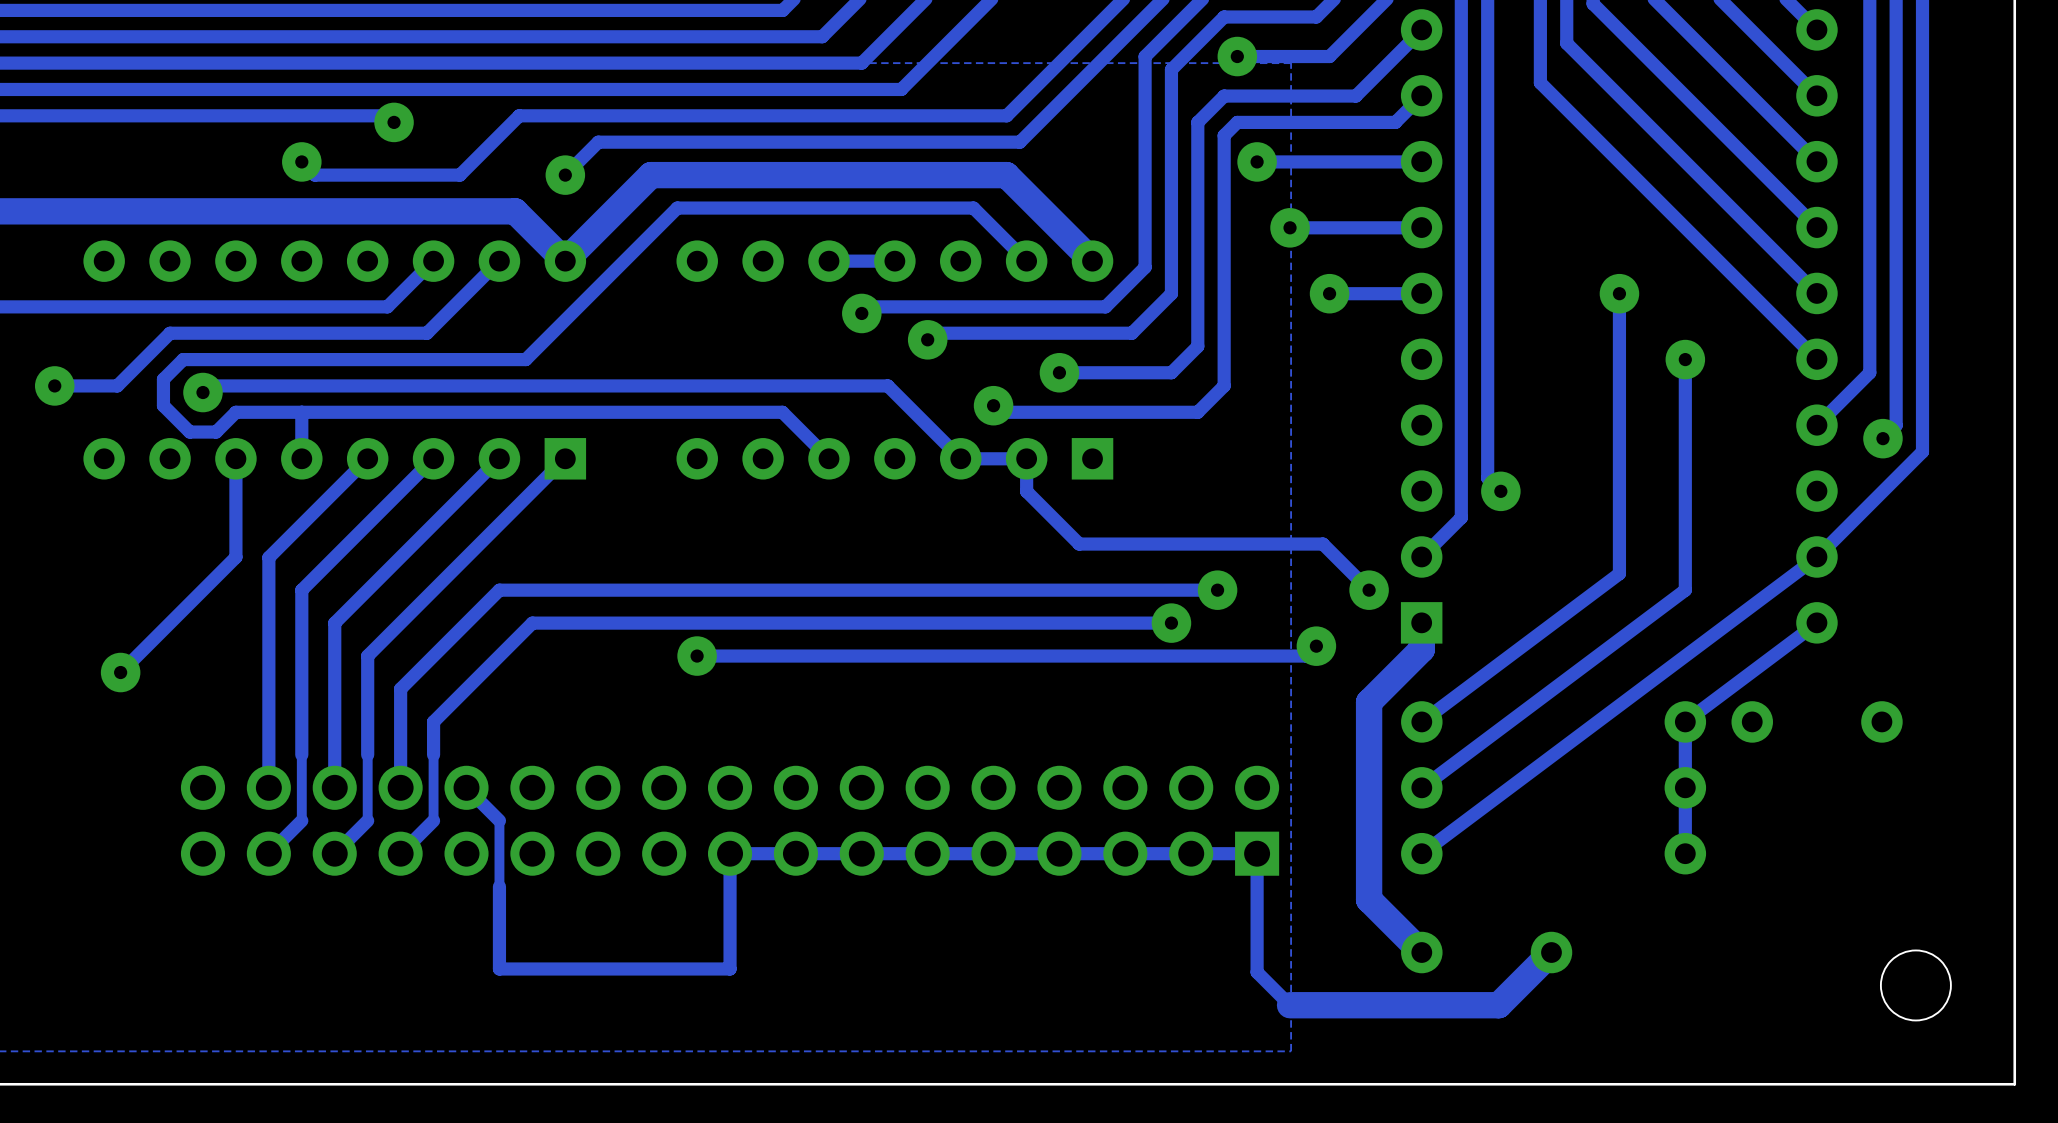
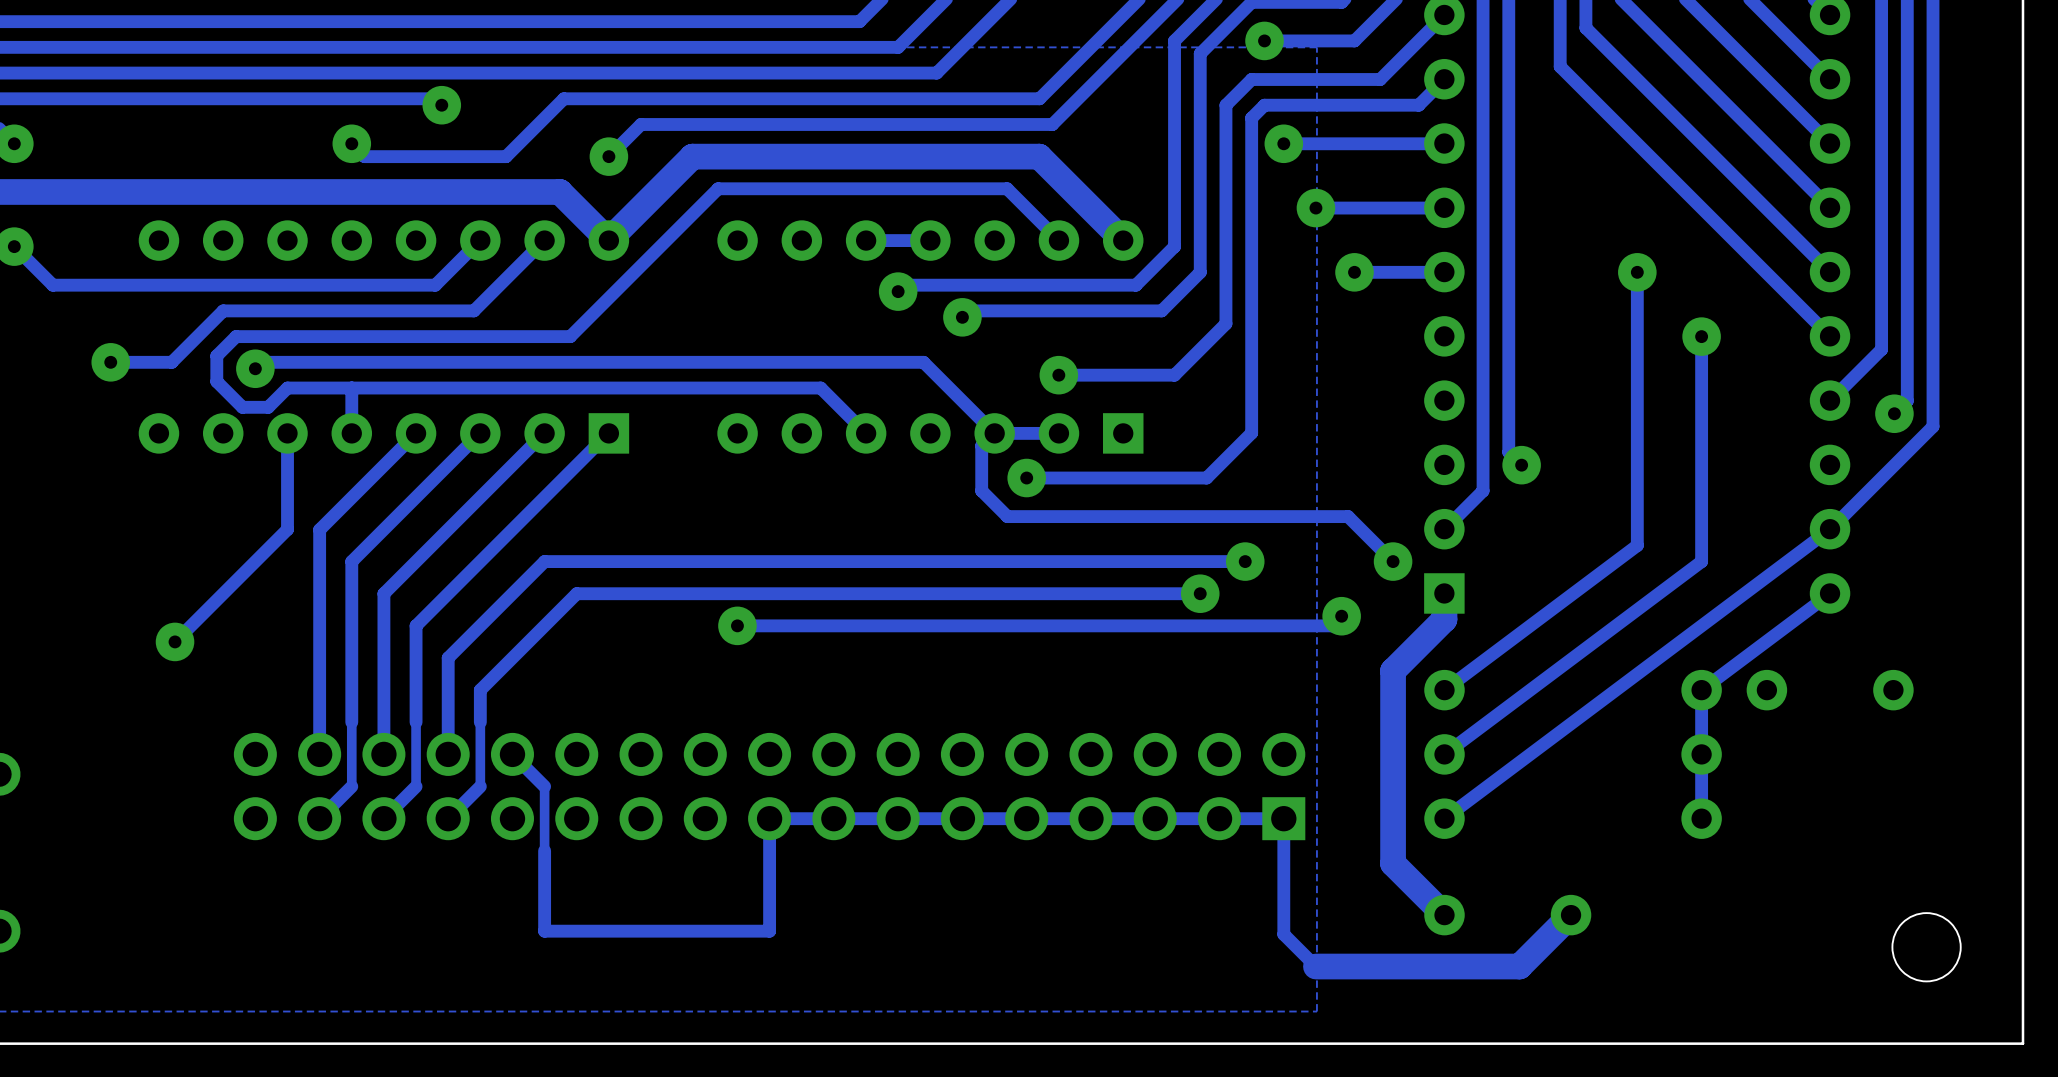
via: (1059, 372) -> none
track: (1171, 372) (1059, 372) -> (1200, 349) (1174, 375) (1058, 375)
track: (1224, 385) (1197, 412) (1000, 412) (993, 405) -> (1251, 362) (1251, 433) (1206, 478) (1026, 478)
via: none -> (1058, 375)
via: (993, 405) -> none
track: (1026, 458) (1026, 491) (1079, 544) -> (994, 433) (981, 445) (981, 490) (1007, 516) (1110, 516)
via: none -> (1026, 478)

